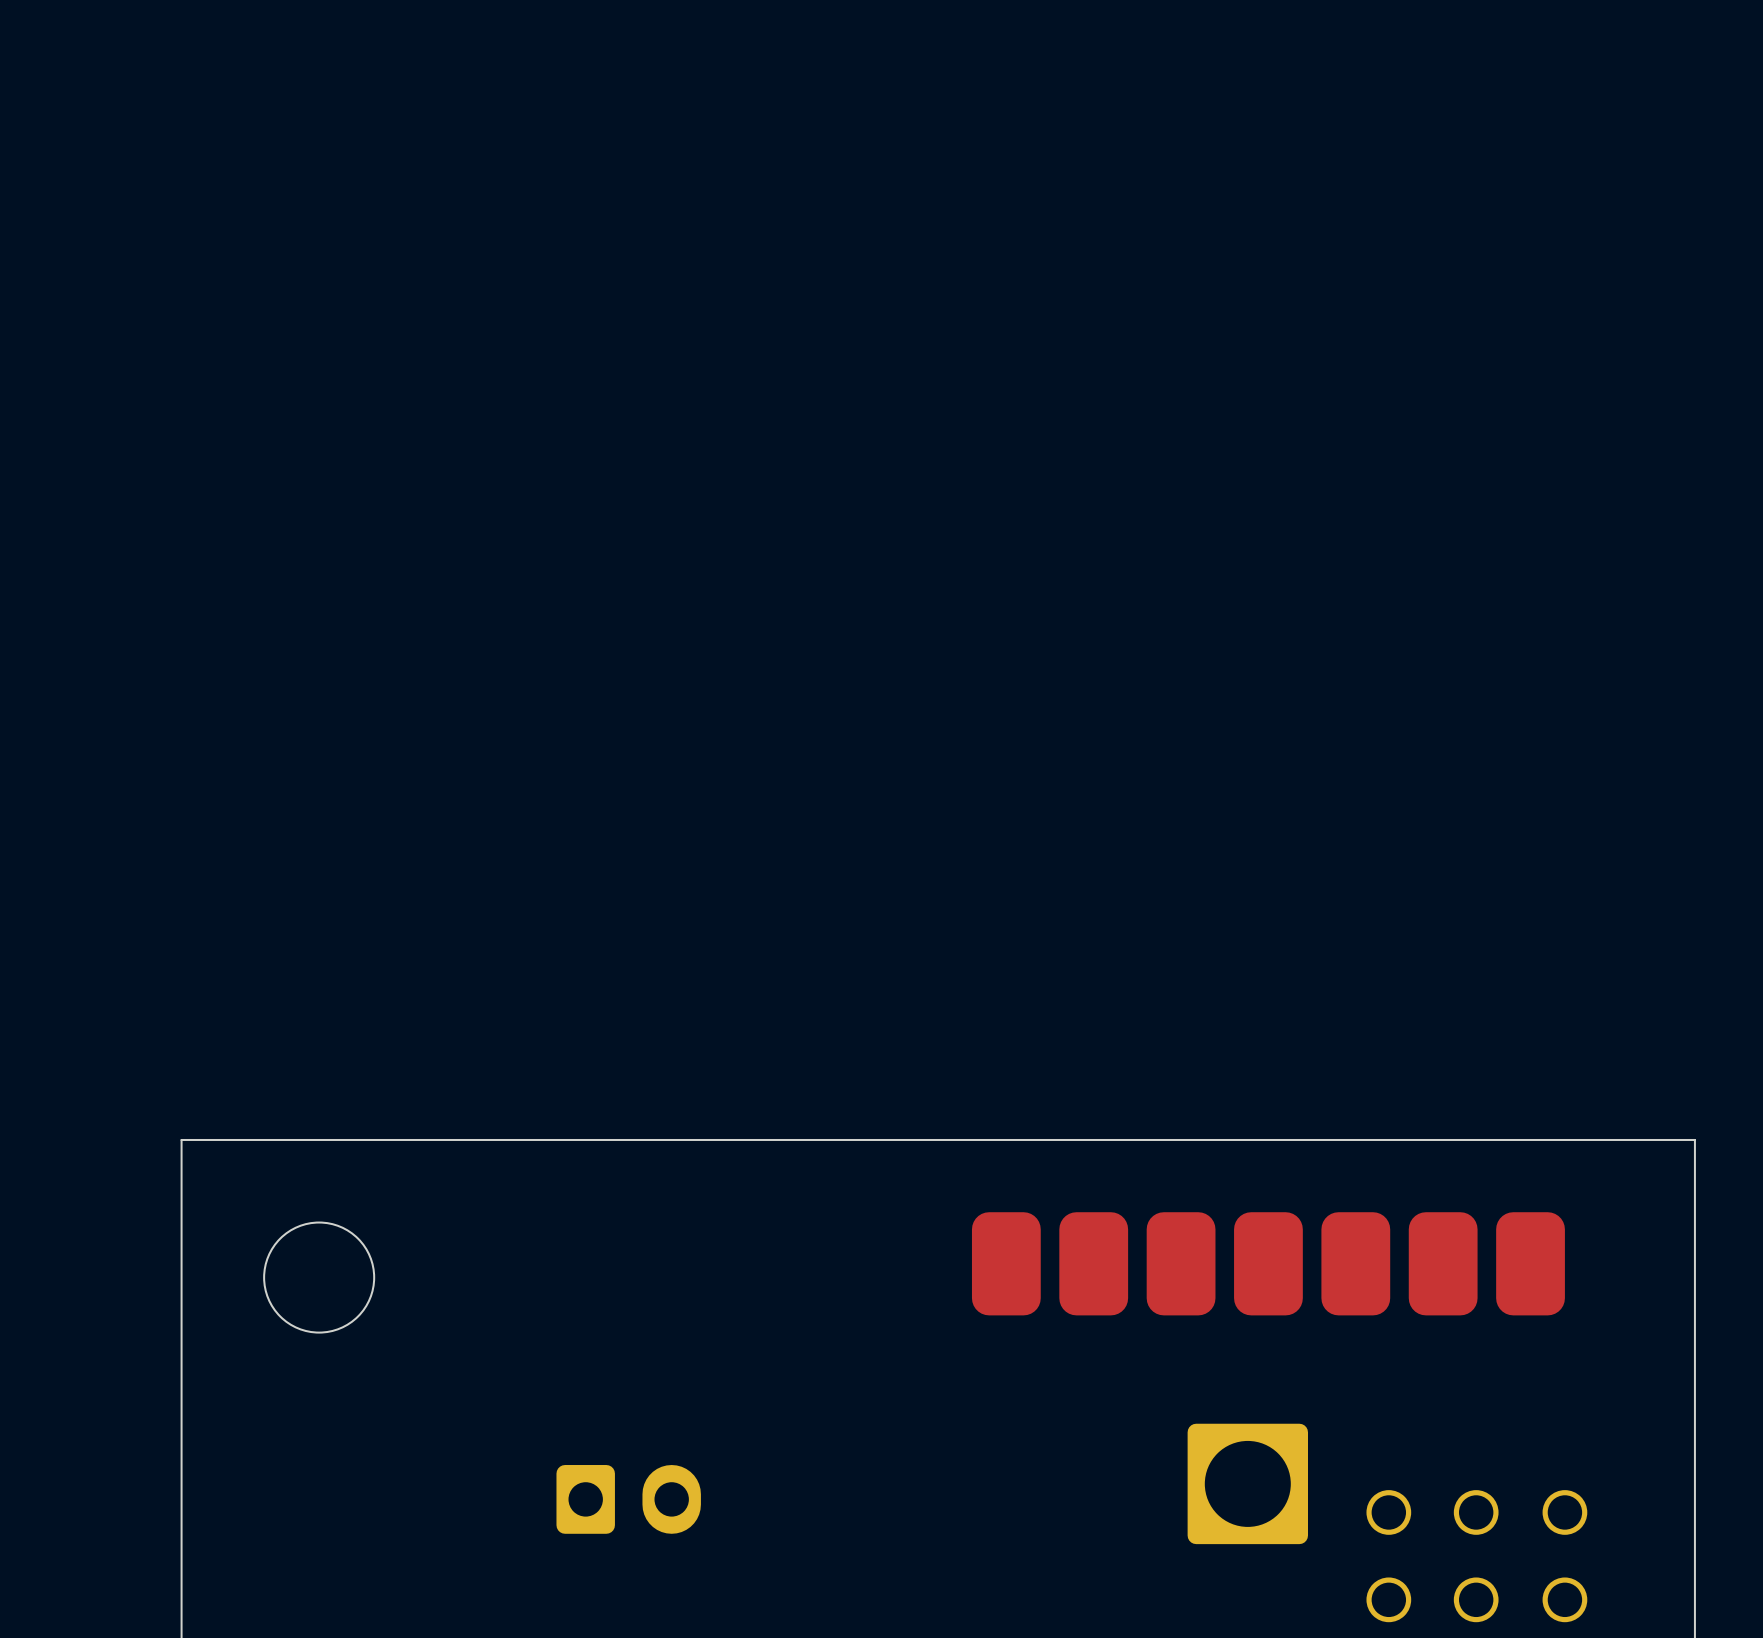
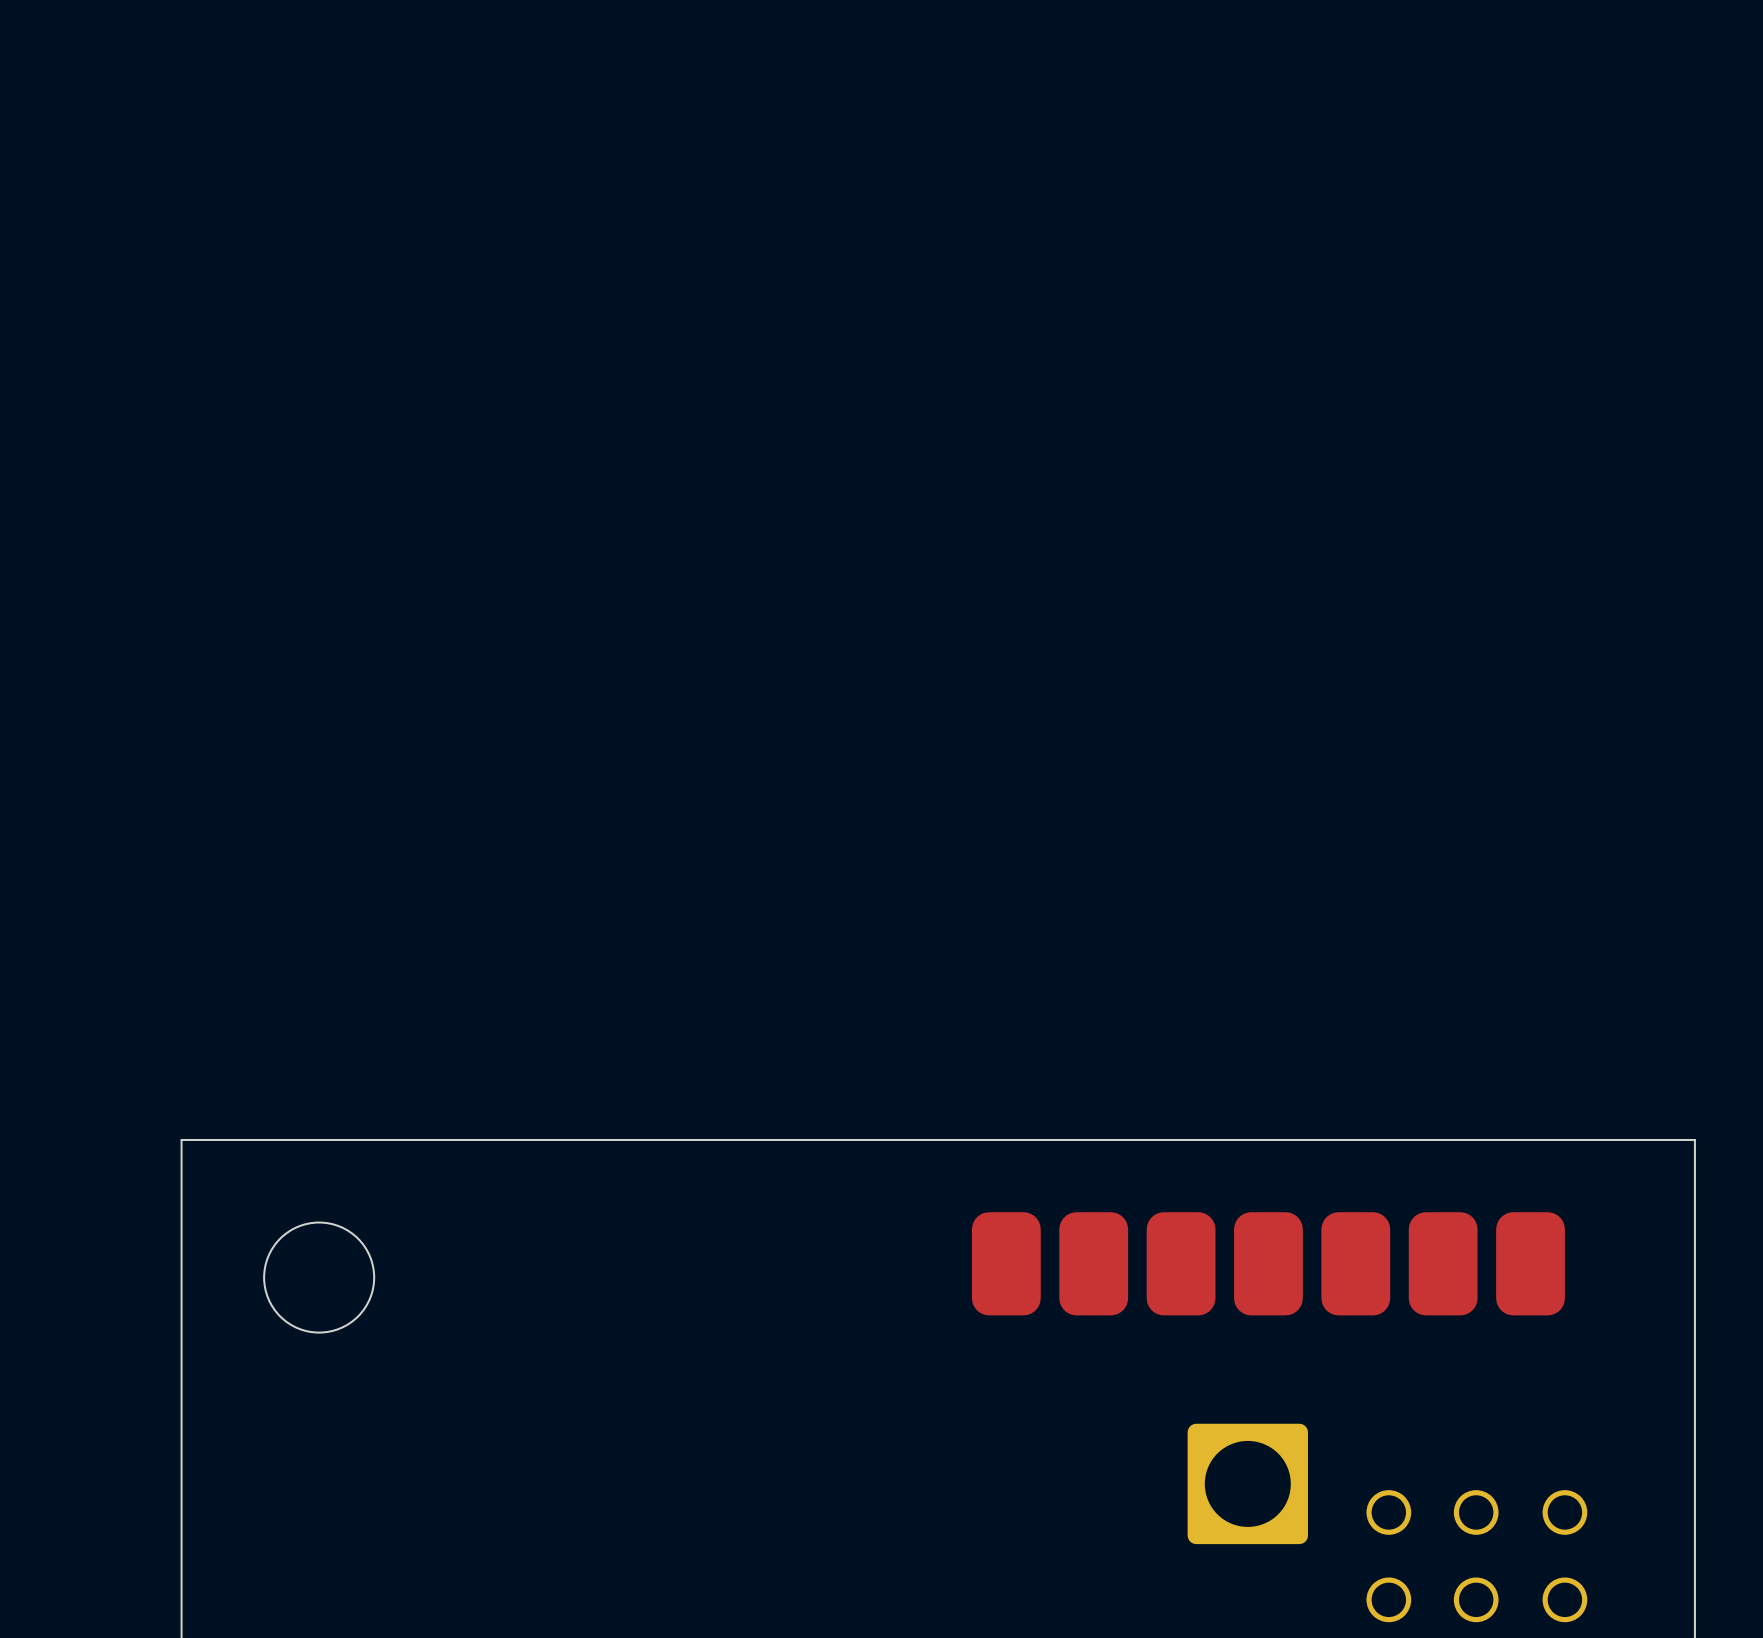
part: (628, 1499) -> none

